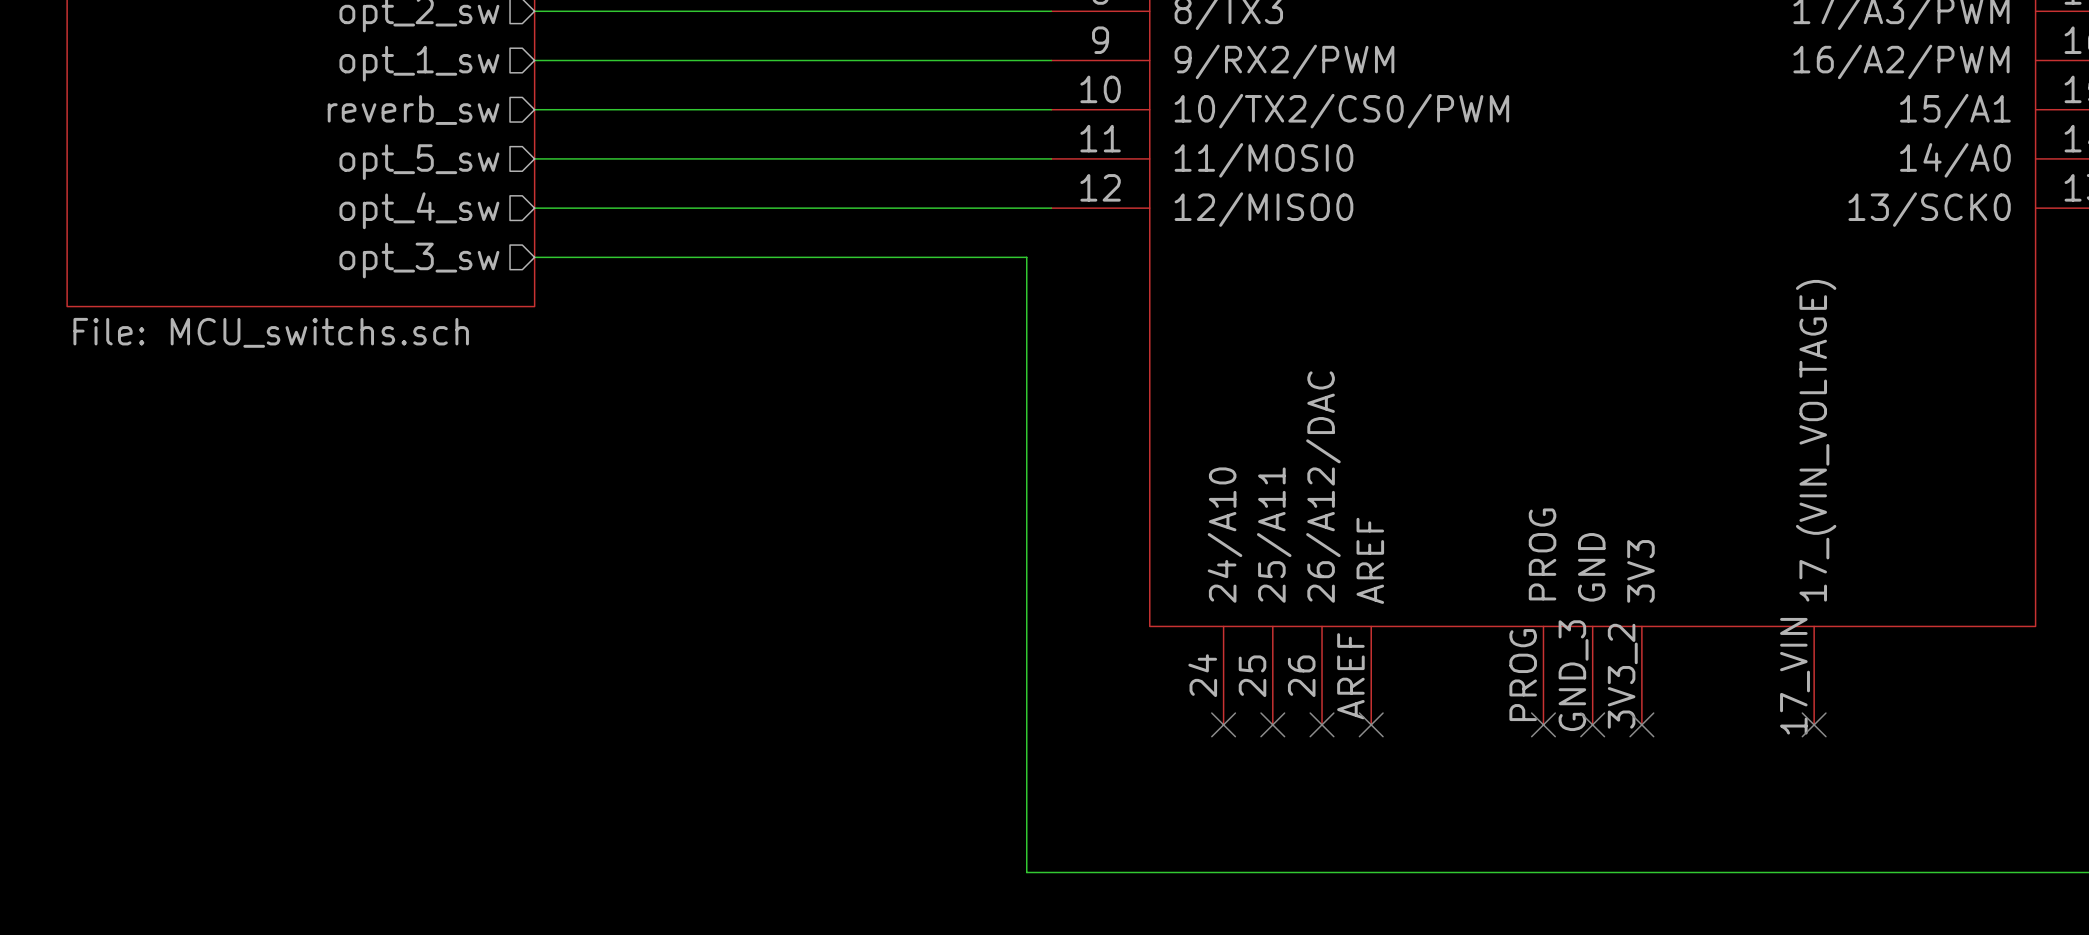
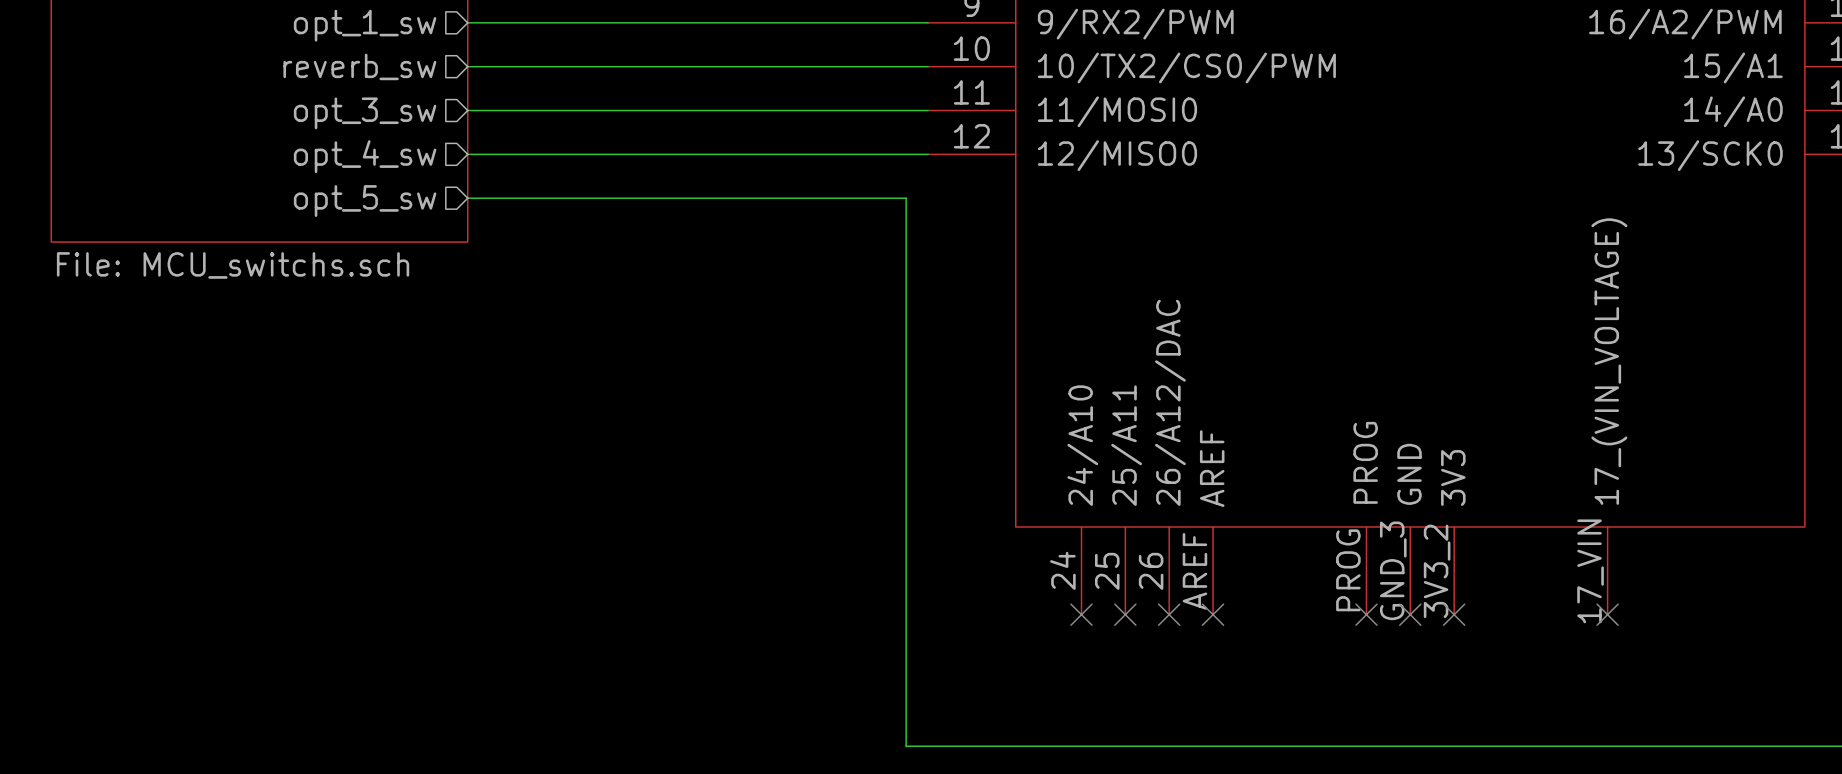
sheet pin: opt_5_sw (419, 162) -> opt_3_sw (365, 113)
sheet pin: opt_3_sw (419, 260) -> opt_5_sw (365, 201)

